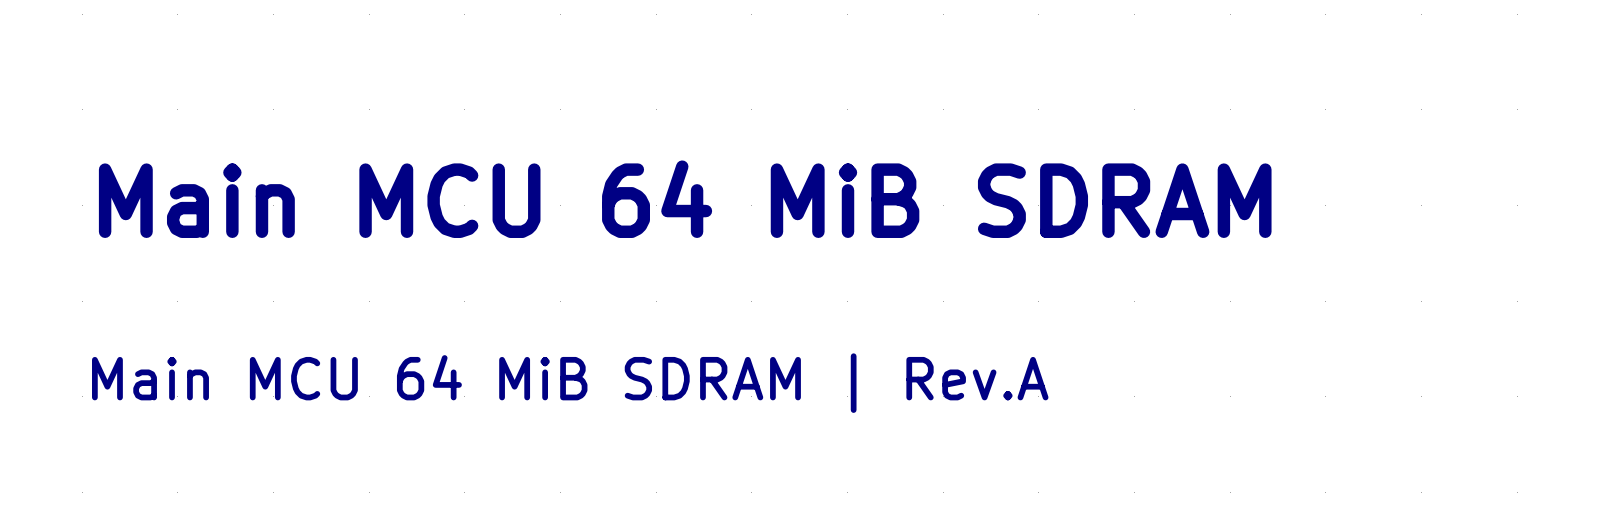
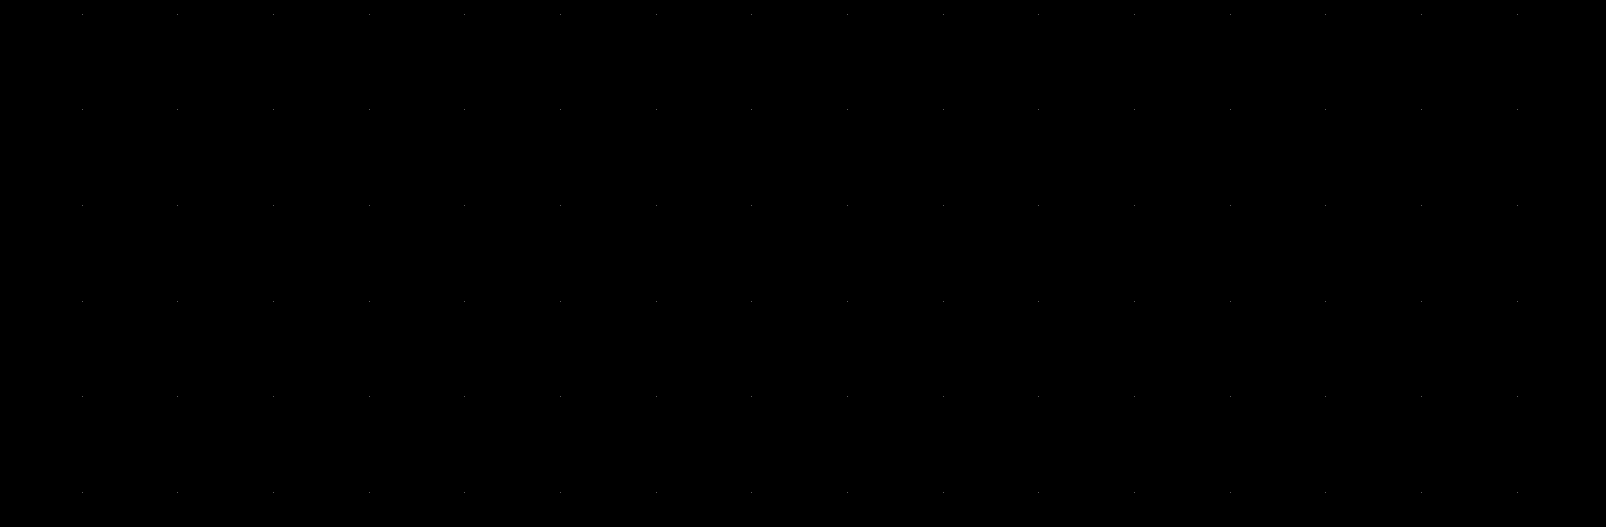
text: Main MCU 64 MiB SDRAM (685, 199) -> none
text: Main MCU 64 MiB SDRAM | Rev.A (570, 383) -> none

